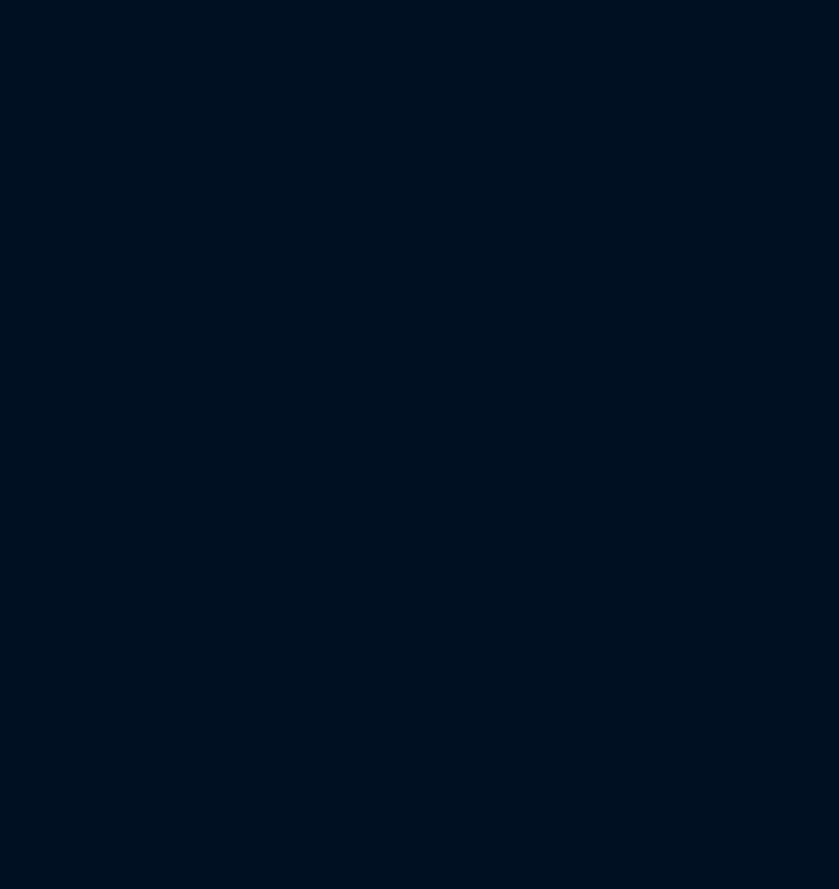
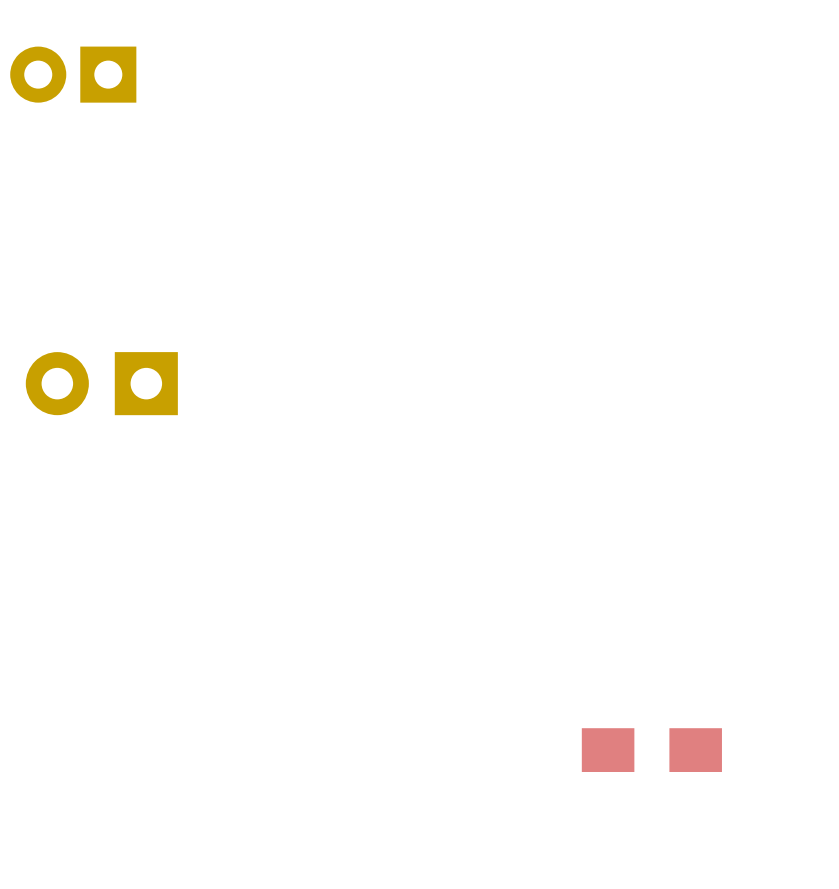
part: none -> (73, 74)
part: none -> (101, 383)
part: none -> (651, 750)

